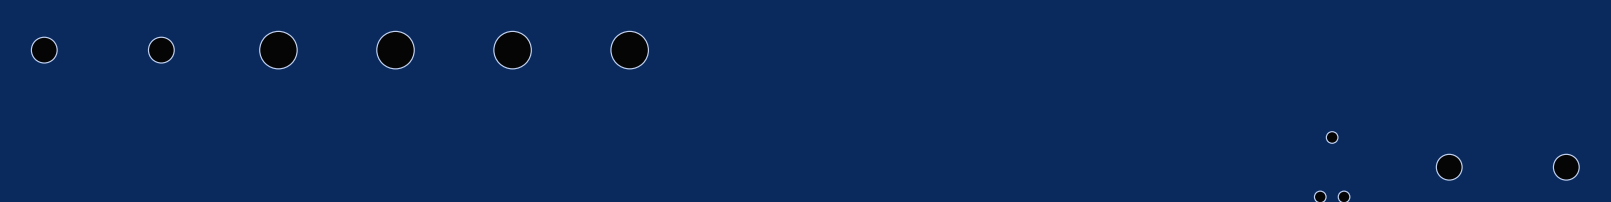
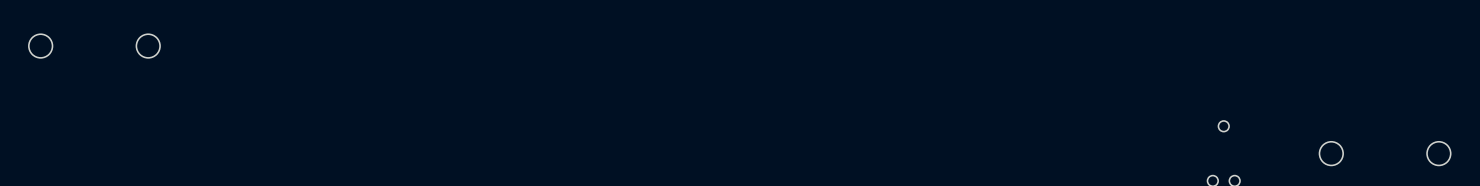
part: (278, 50) -> none
part: (395, 50) -> none
part: (512, 50) -> none
part: (629, 50) -> none

